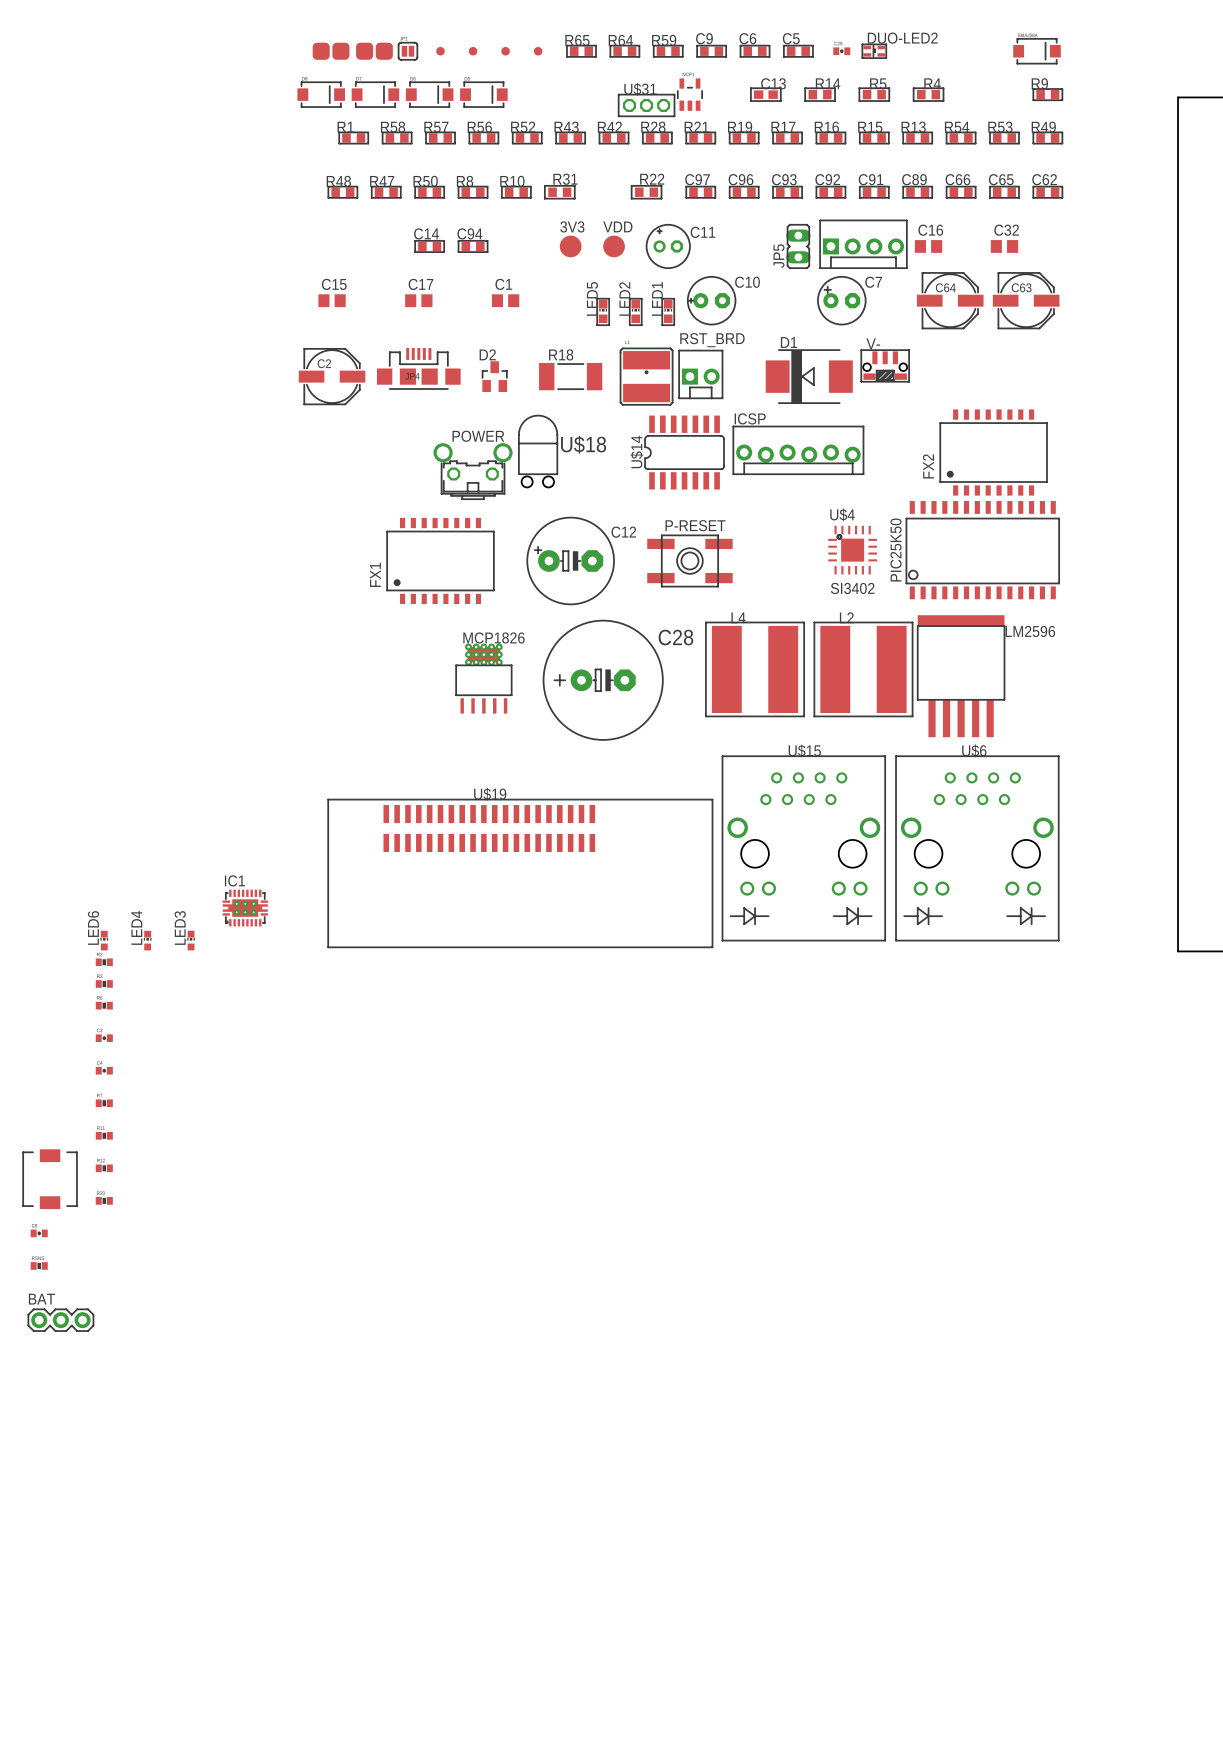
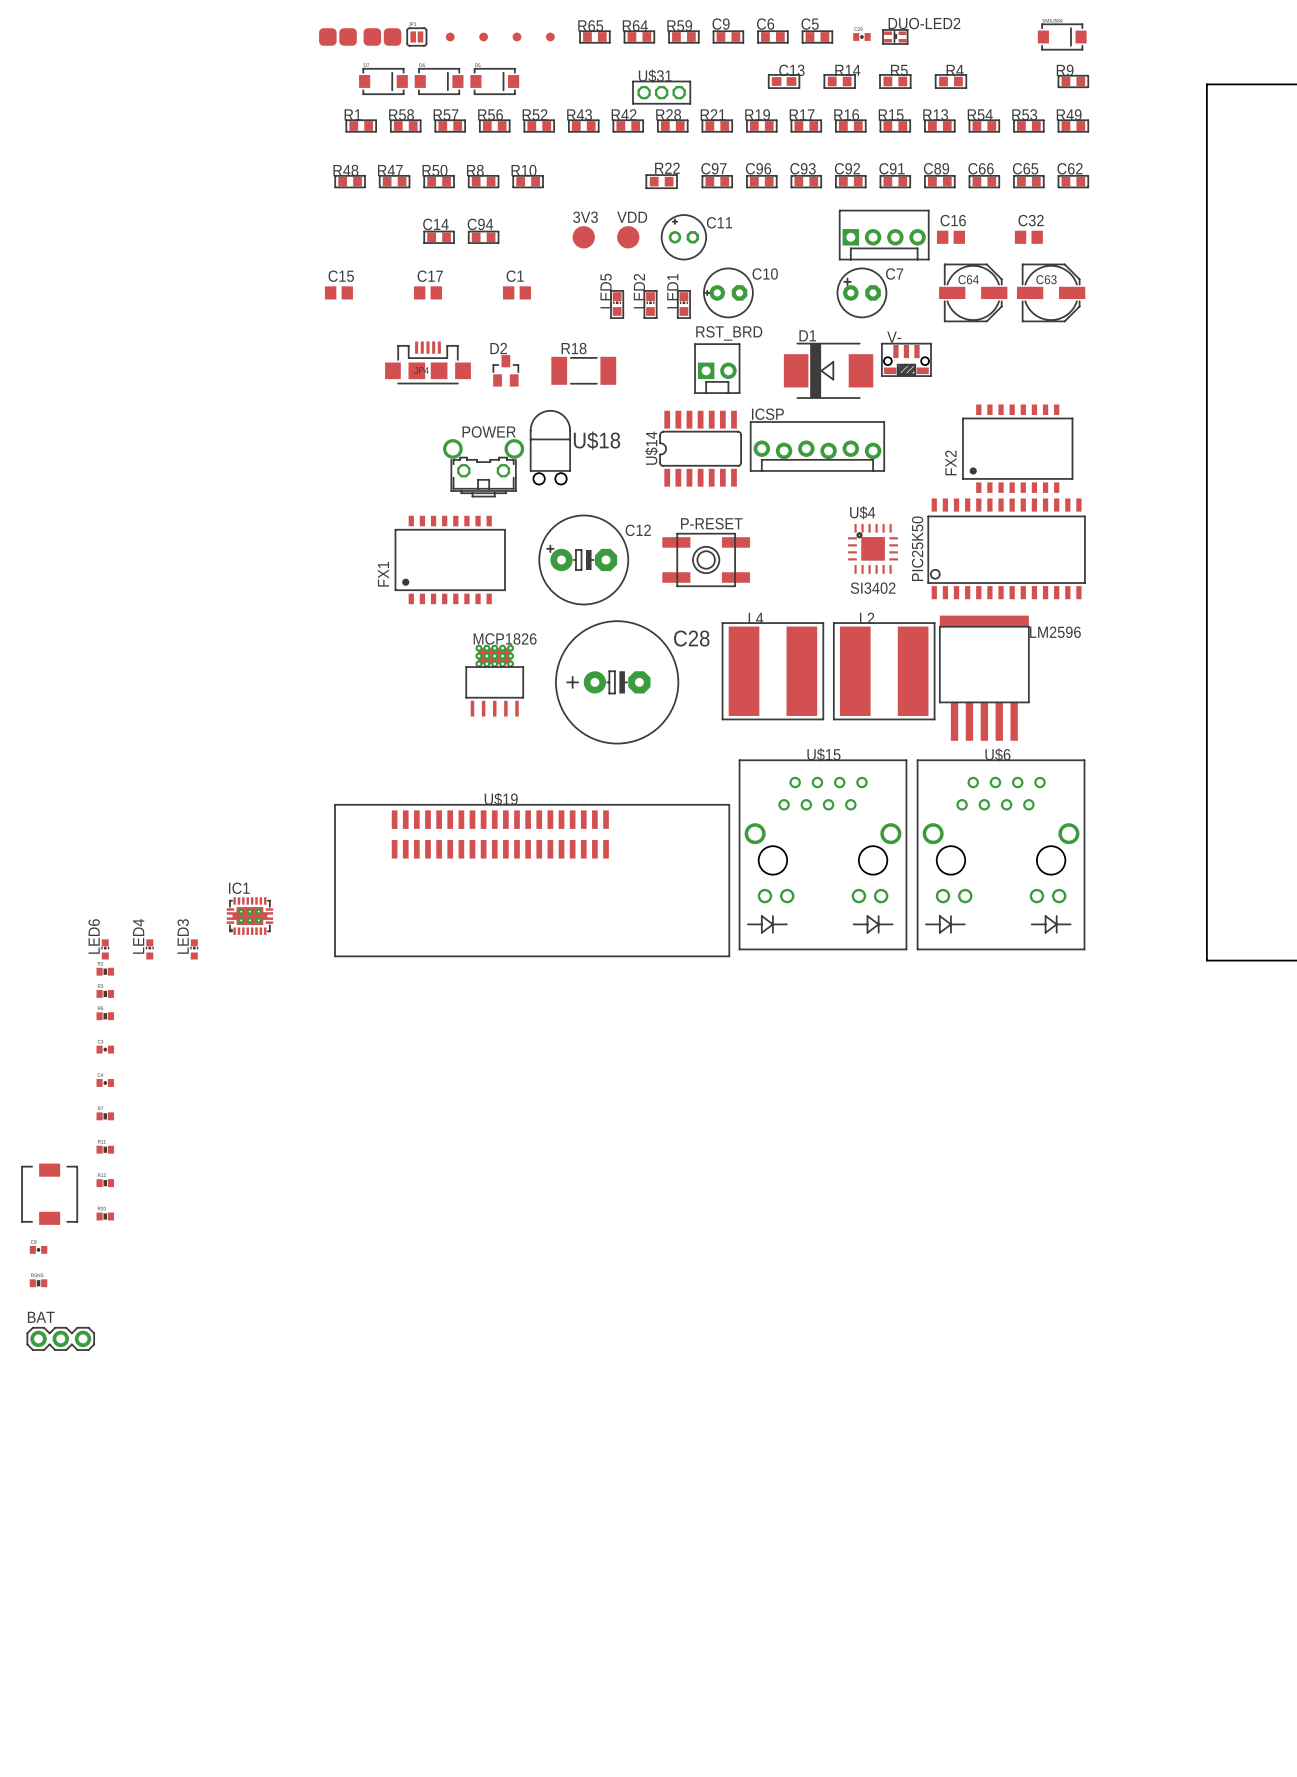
part: (321, 94) -> none
part: (689, 94) -> none
R31: (559, 192) -> none
JP5: (798, 246) -> none
C2: (332, 376) -> none
part: (646, 376) -> none

